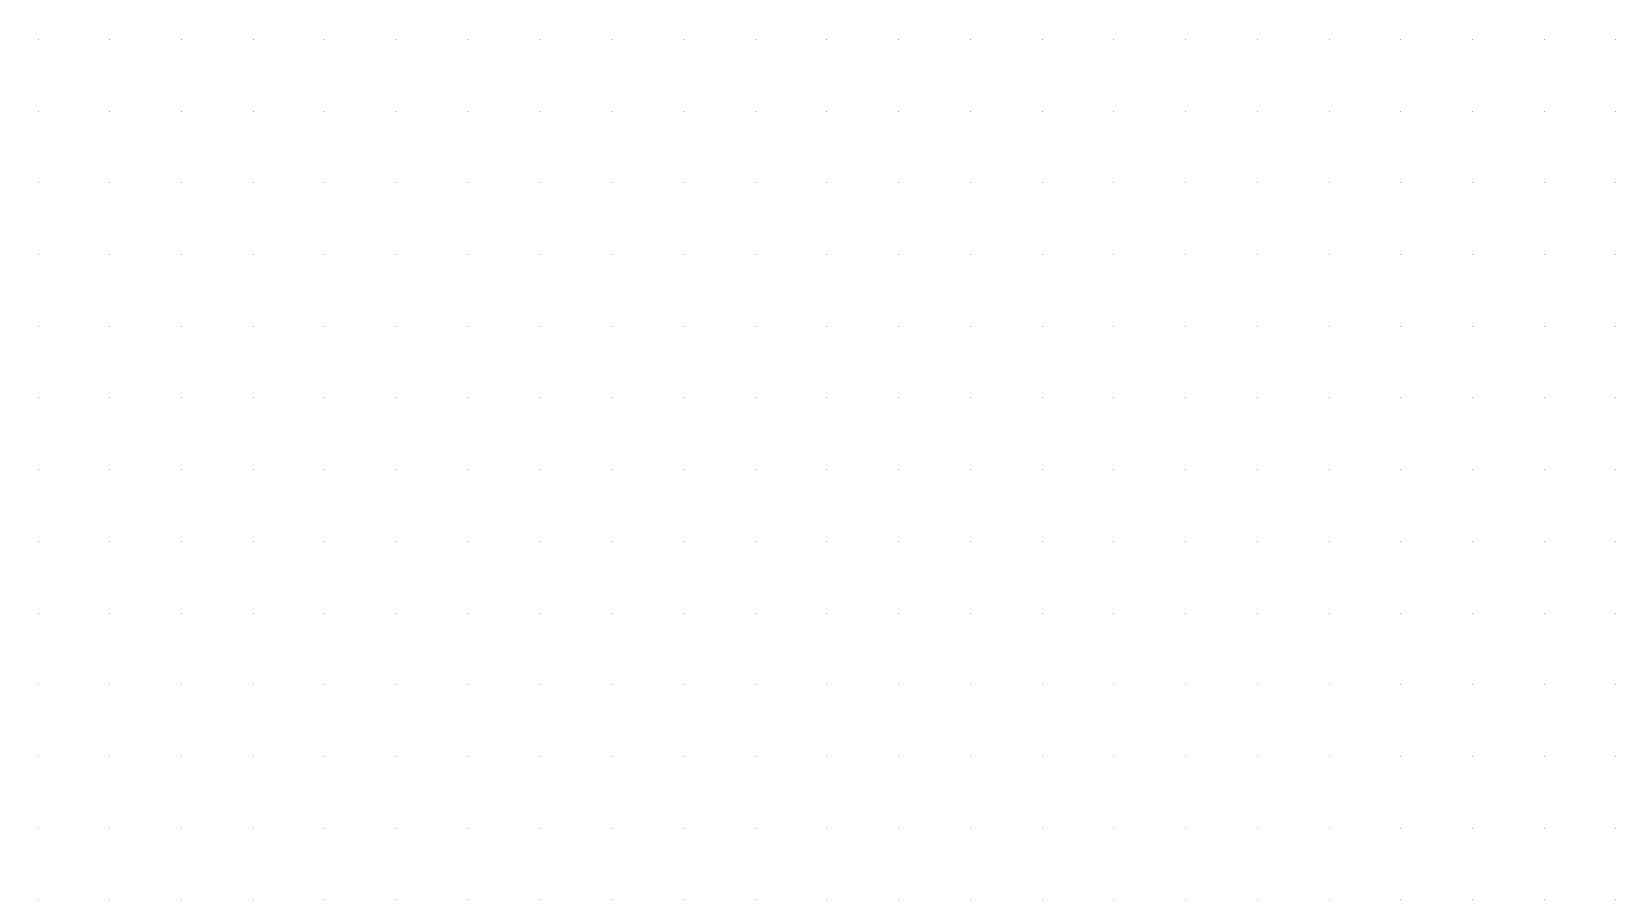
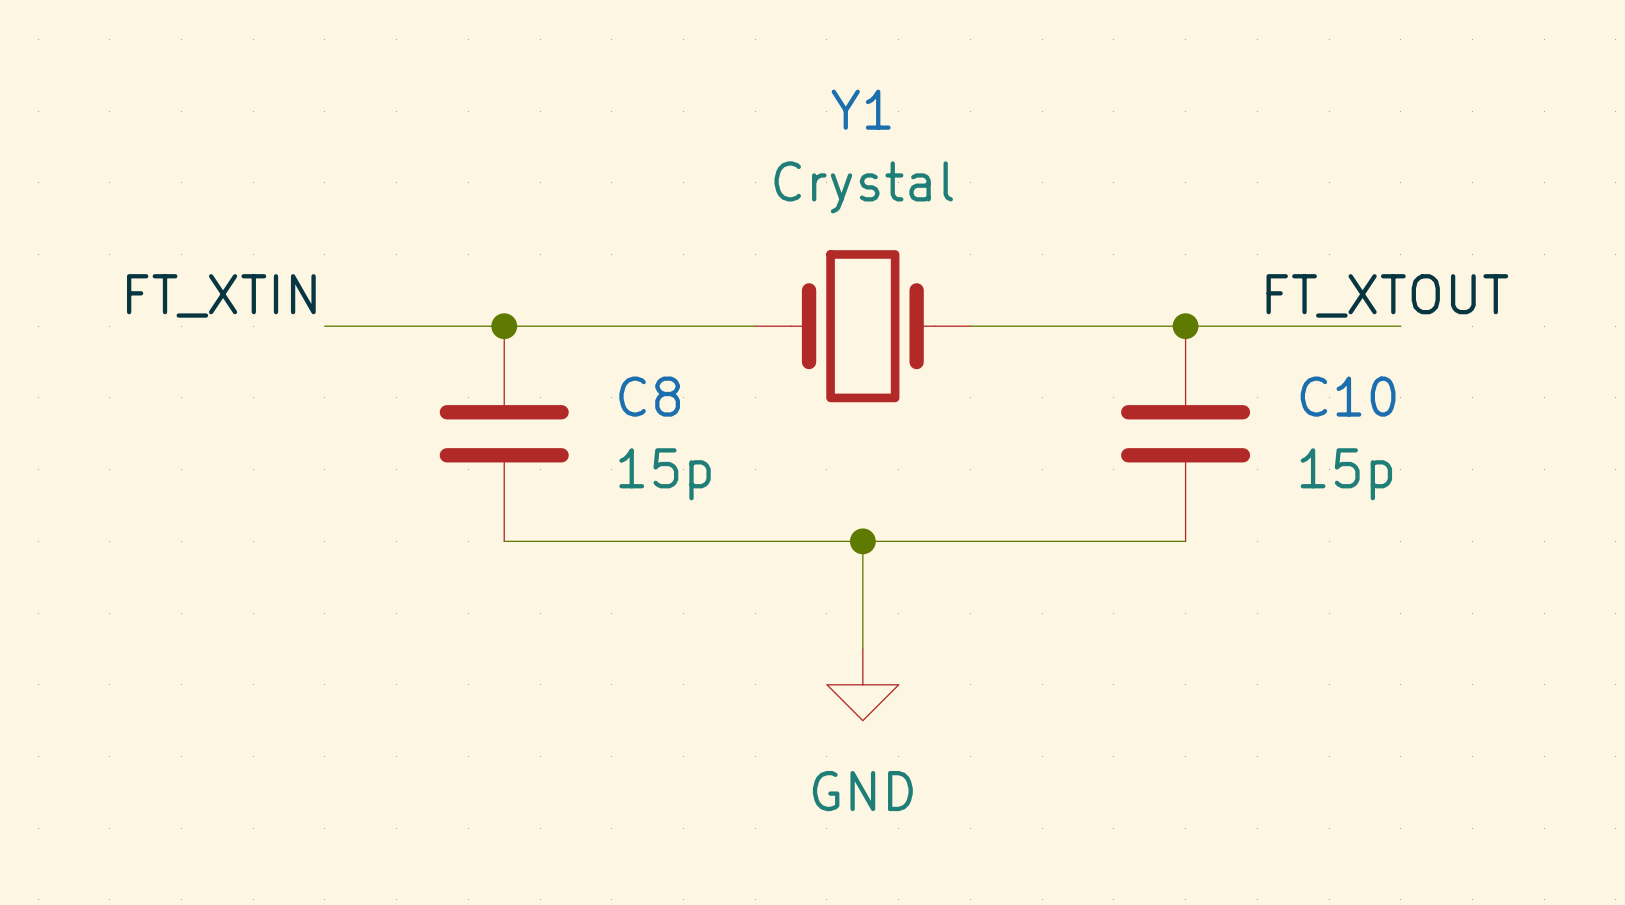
label: none -> FT_XTIN (221, 295)
label: none -> FT_XTOUT (1387, 295)
wire: none -> (324, 326) (755, 326)
junction: none -> (504, 326)
Y1: none -> Crystal (862, 326)
wire: none -> (970, 326) (1400, 326)
junction: none -> (1185, 326)
C8: none -> 15p (504, 433)
C10: none -> 15p (1185, 433)
wire: none -> (504, 541) (1185, 541)
wire: none -> (862, 541) (862, 648)
junction: none -> (862, 541)
power symbol: none -> GND (862, 684)

